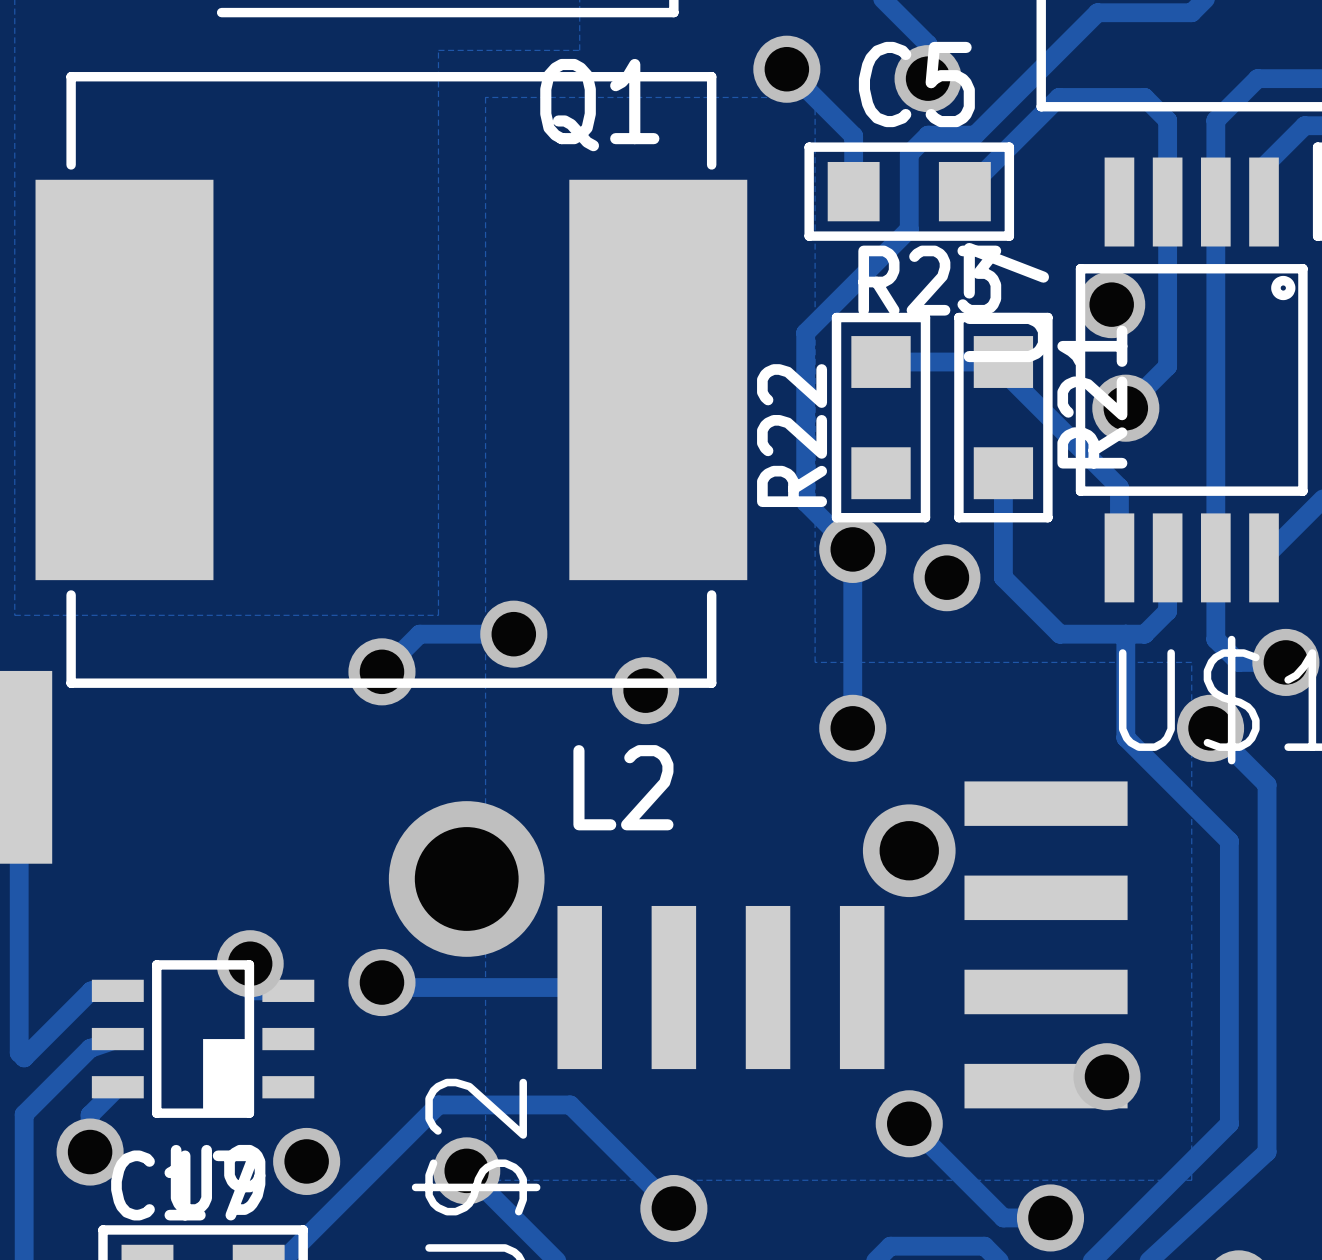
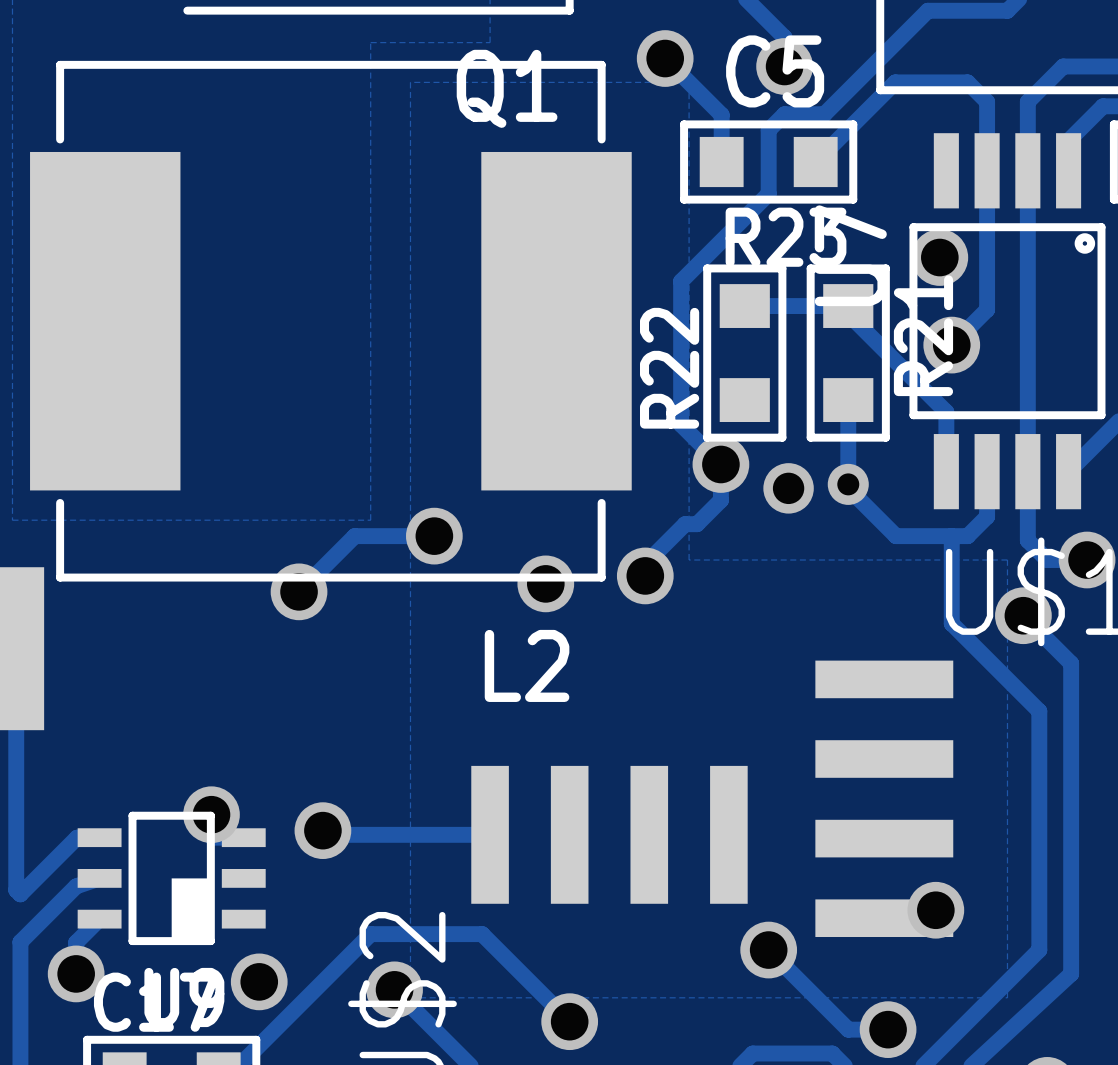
via size: [913, 544, 981, 612] -> [763, 463, 814, 514]
via: none -> (848, 484)
track: (852, 591) (852, 728) -> (720, 500) (697, 524) (685, 524) (645, 563) (645, 575)
via position: (381, 671) -> (299, 591)
via position: (852, 728) -> (645, 575)
via: (909, 850) -> none
via: (466, 878) -> none

